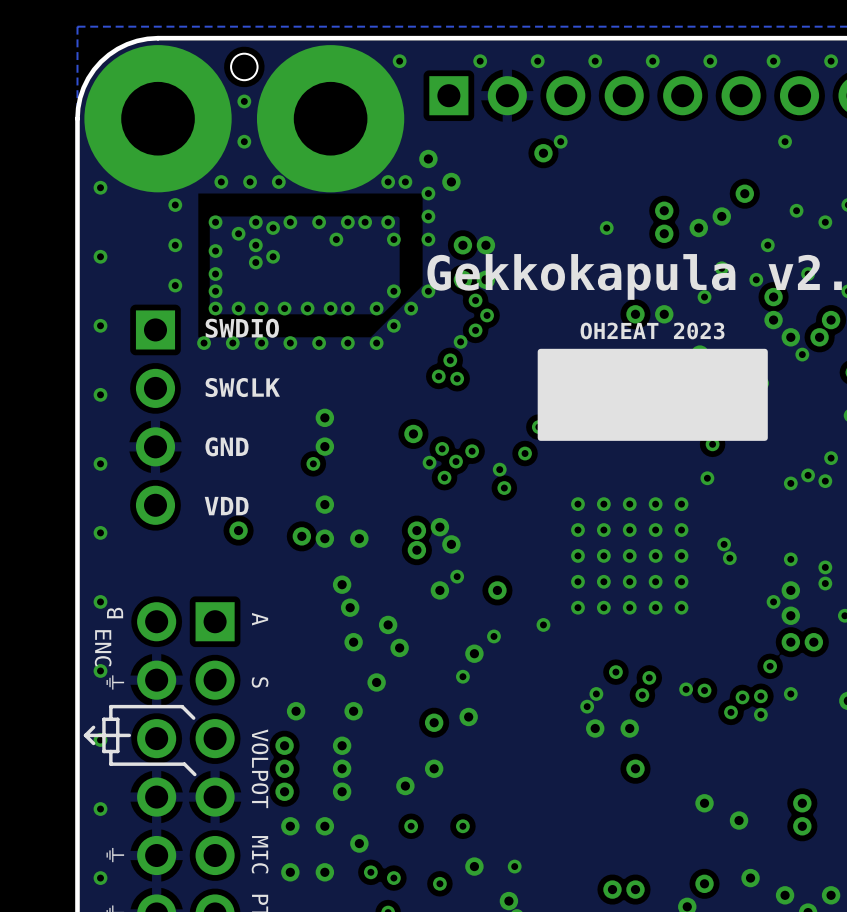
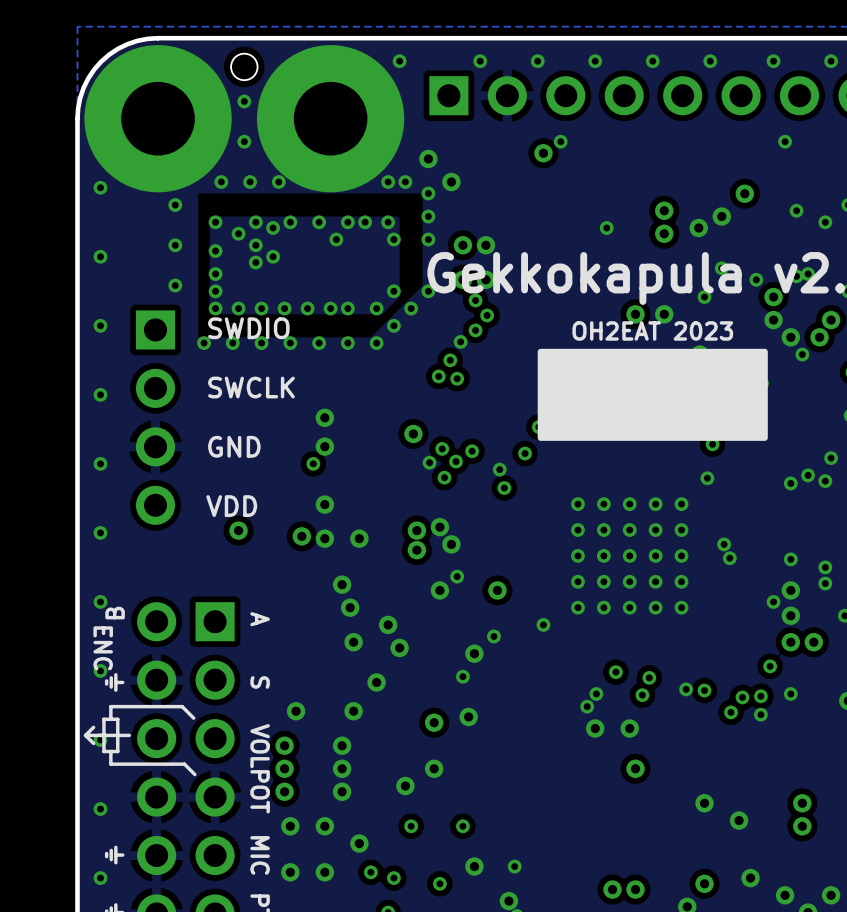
via: (767, 245) -> none
via: none -> (796, 276)

